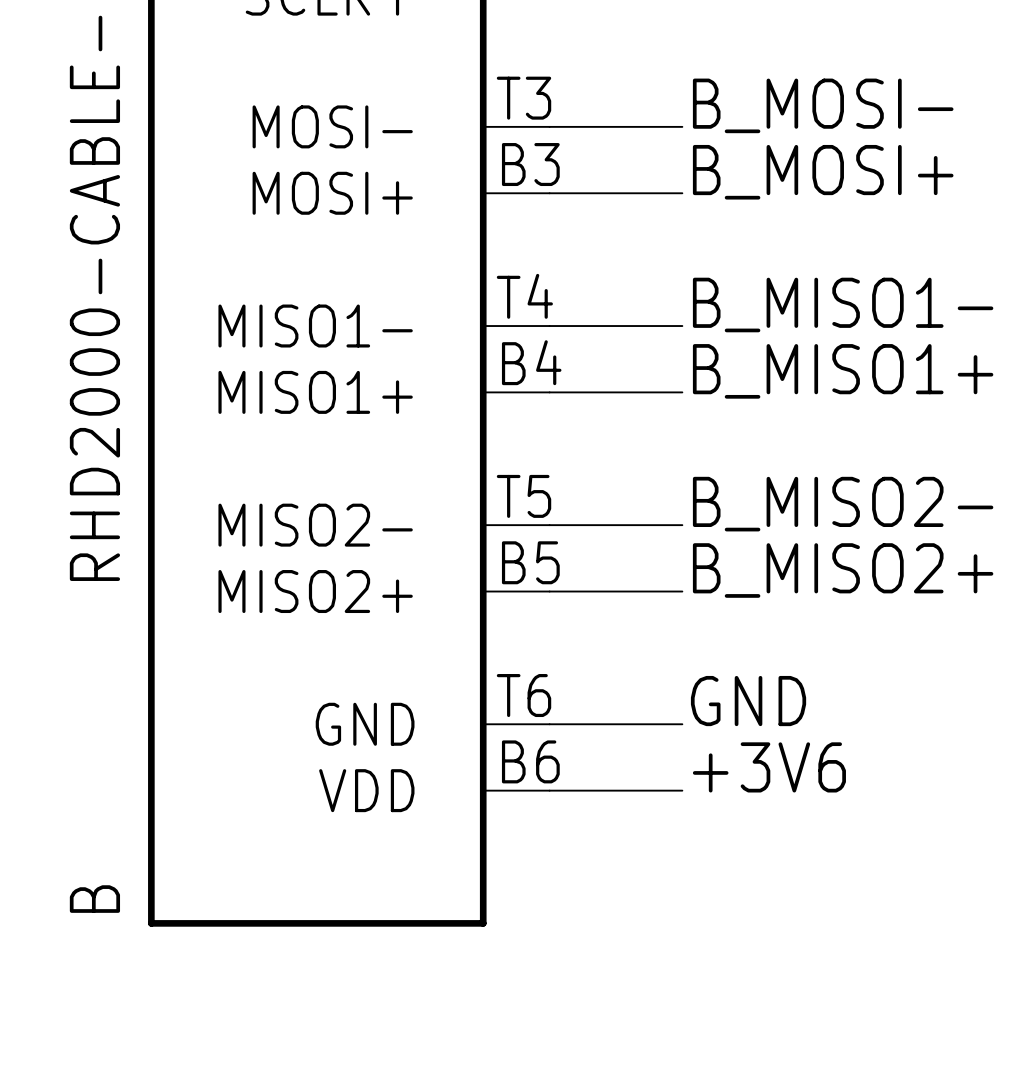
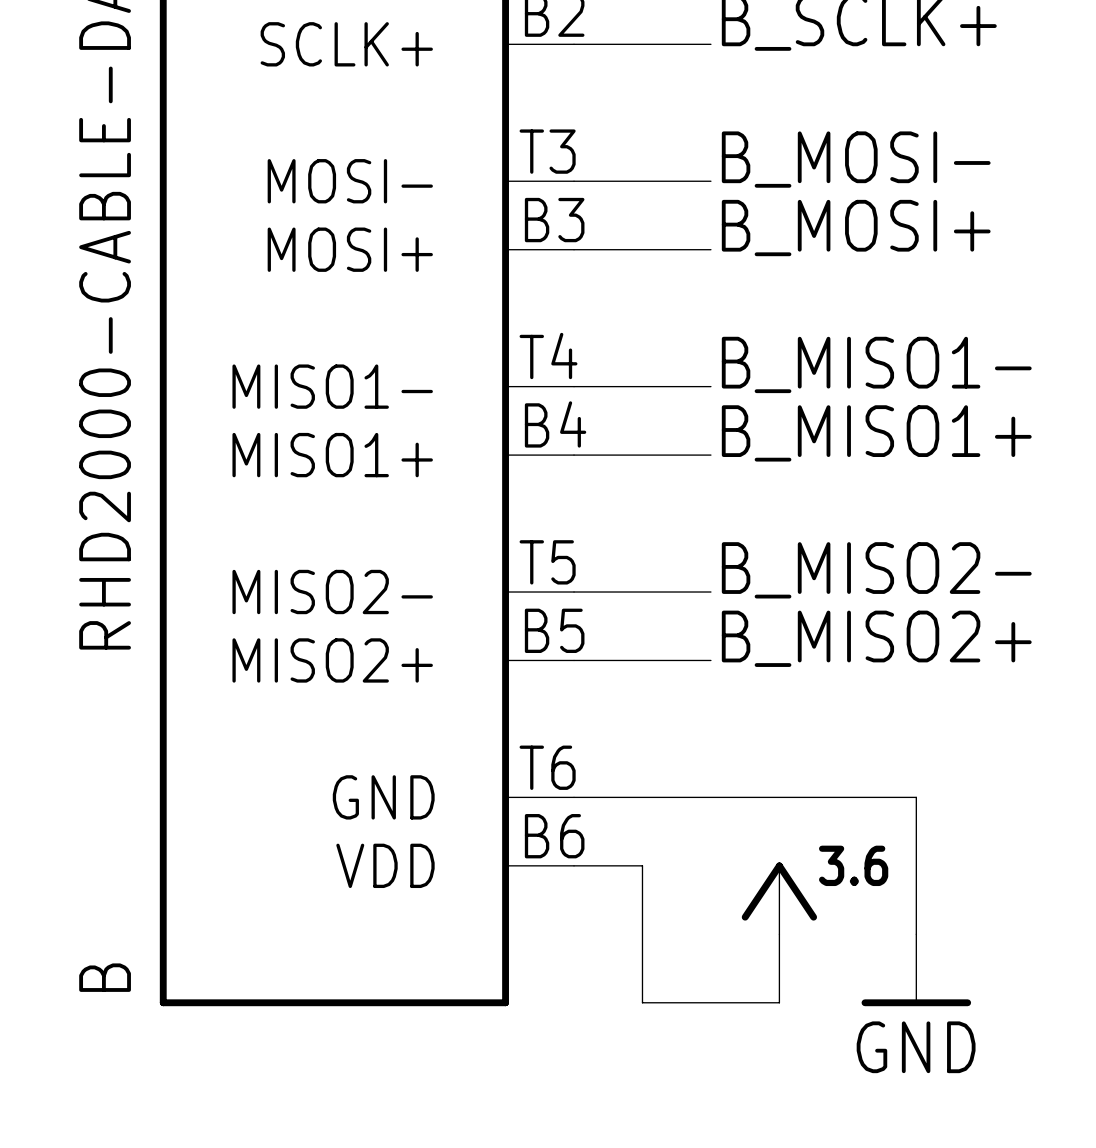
label: GND (748, 701) -> none
wire: none -> (710, 797) (916, 797) (916, 934)
label: +3V6 (769, 767) -> none
wire: (615, 790) (682, 790) -> (642, 865) (642, 1002) (779, 1002) (779, 934)
power symbol: none -> (779, 898)
power symbol: none -> GND (916, 970)

